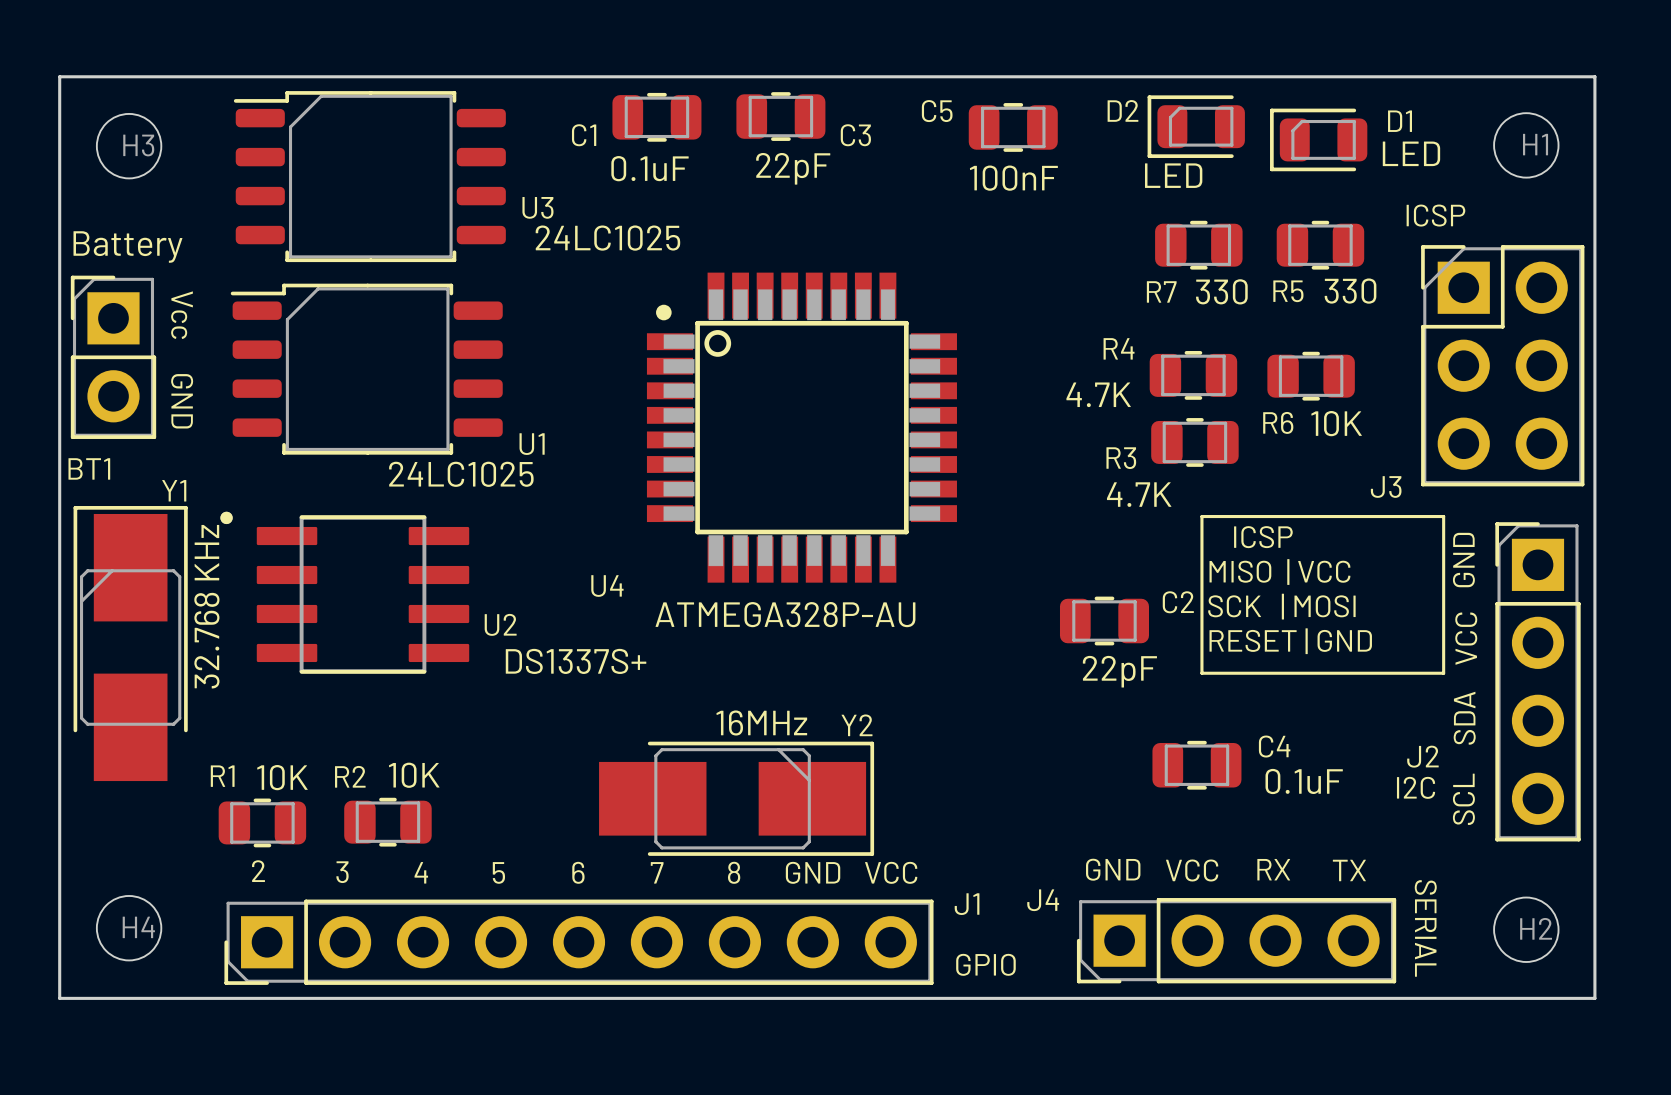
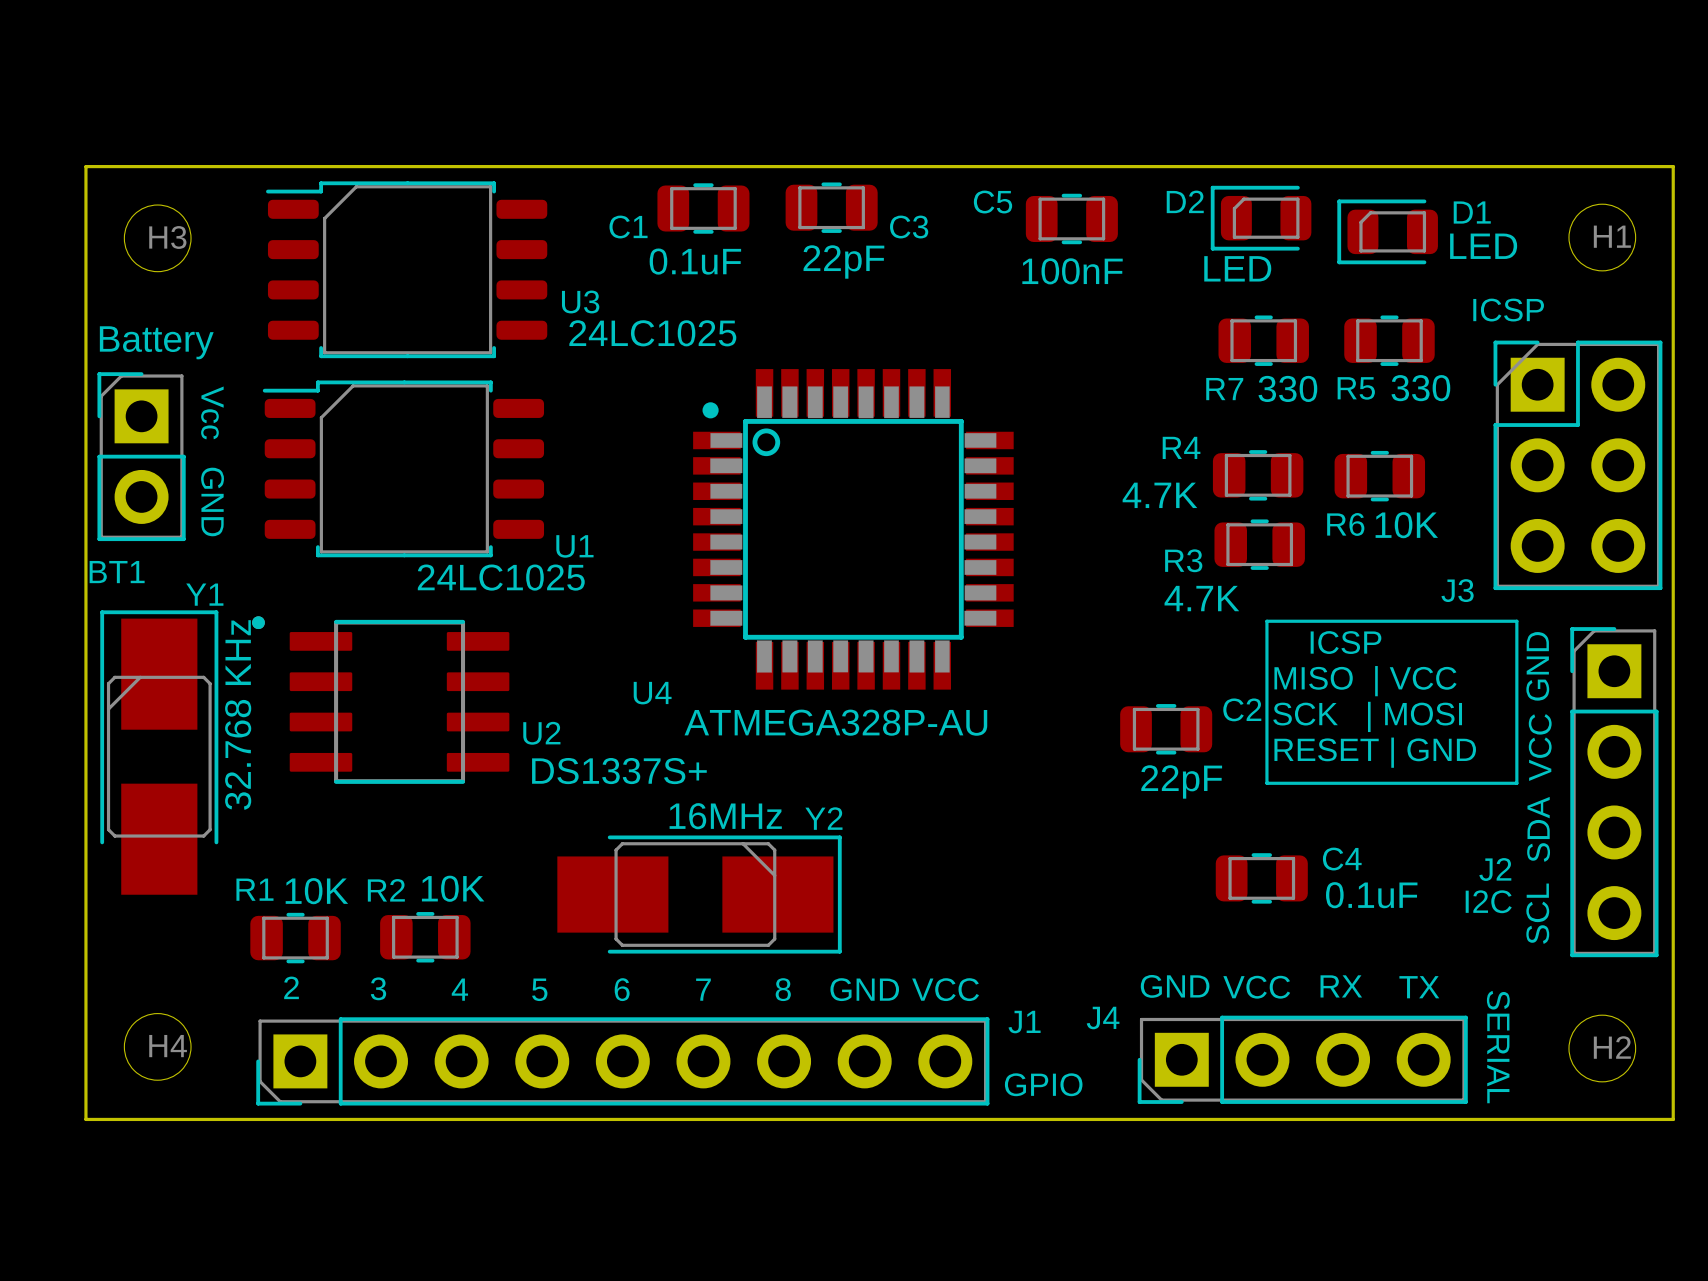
Y2 position: (736, 798) -> (699, 894)

